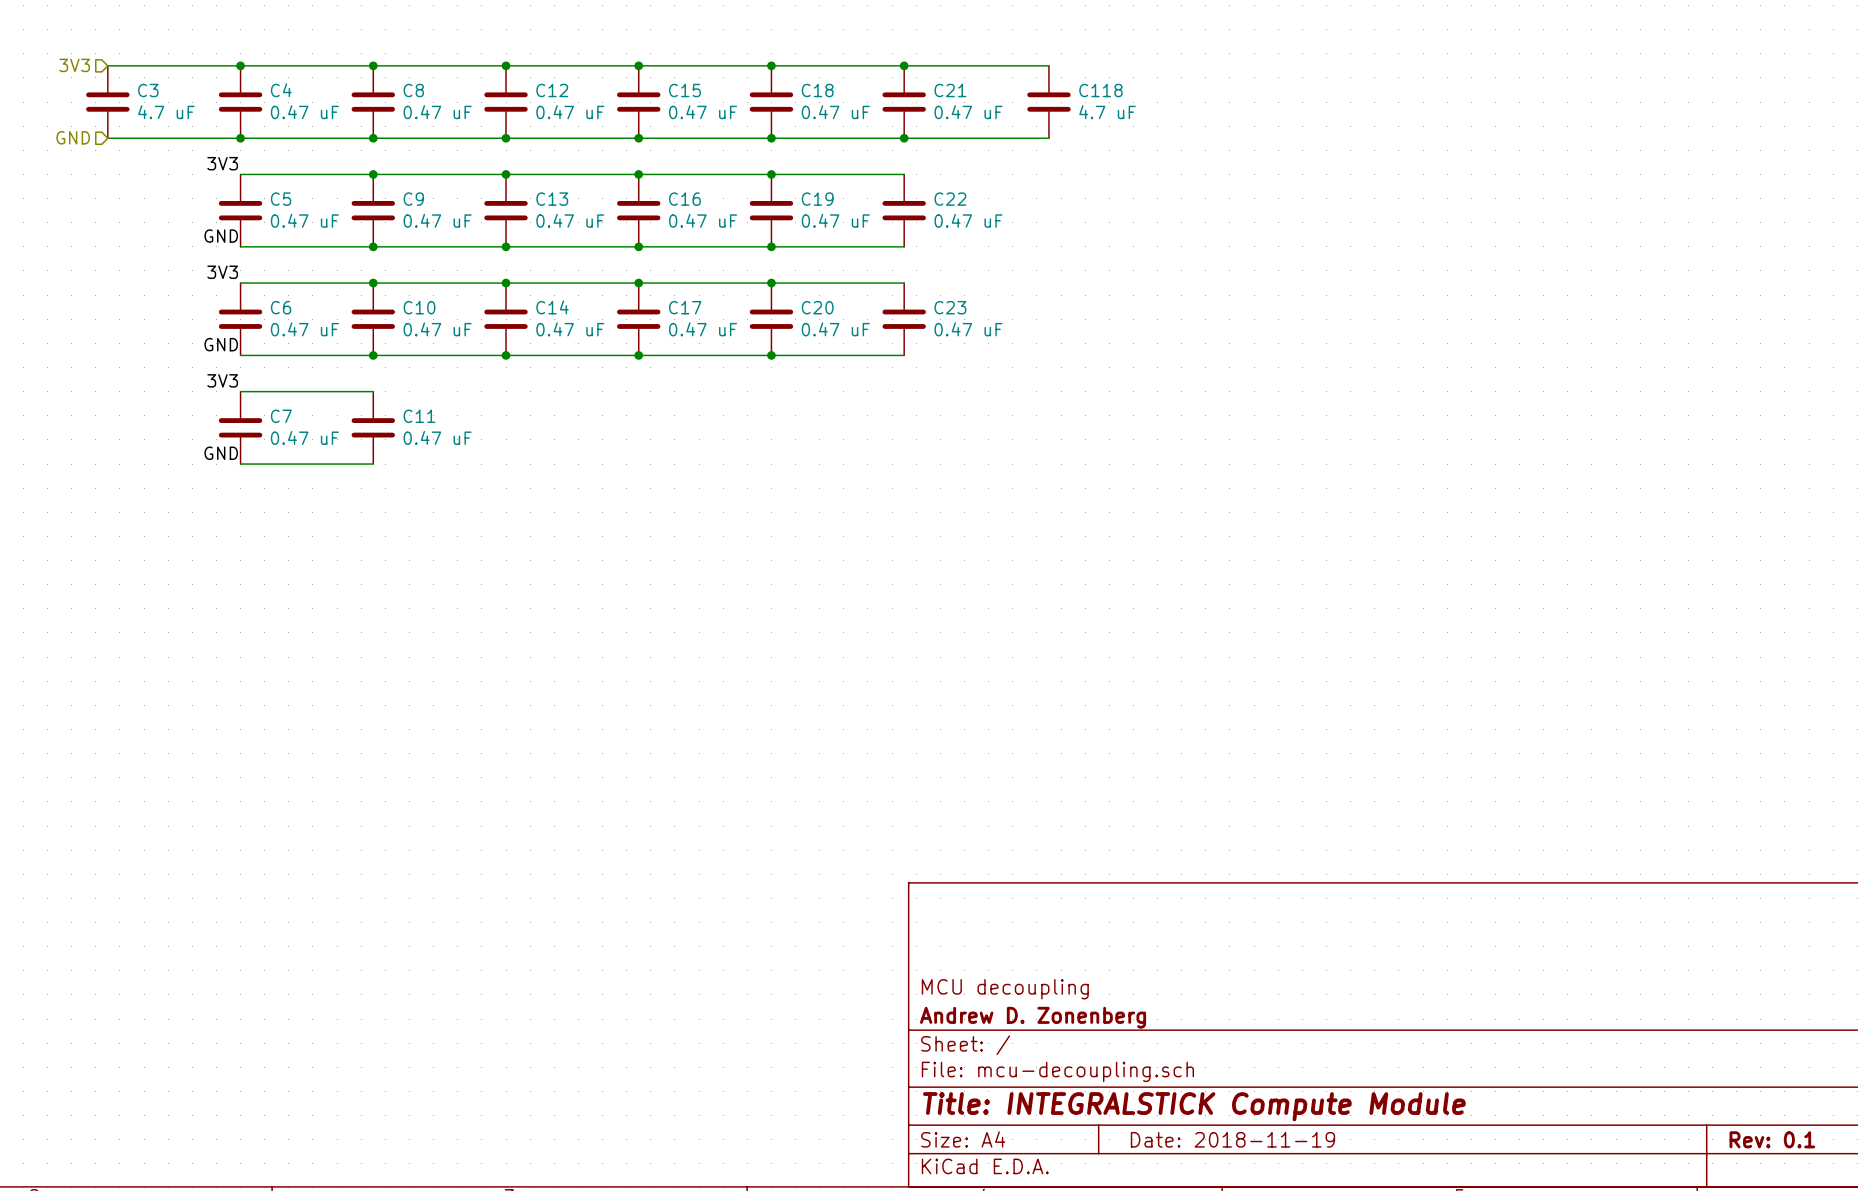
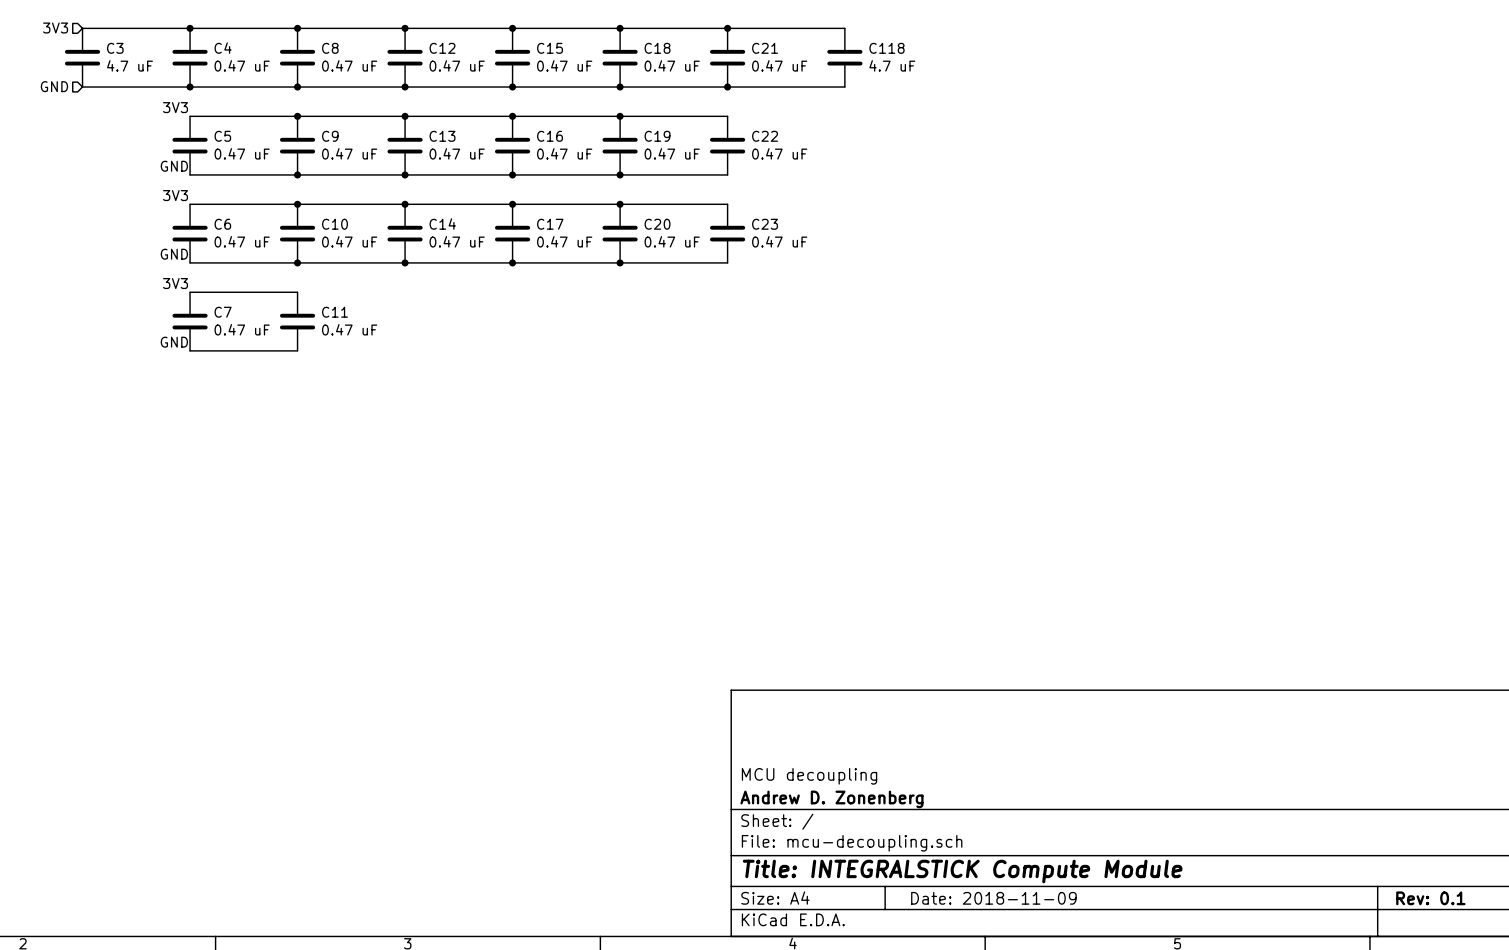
title block: Date: 2018-11-19 (1232, 1139) -> Date: 2018-11-09 (993, 898)

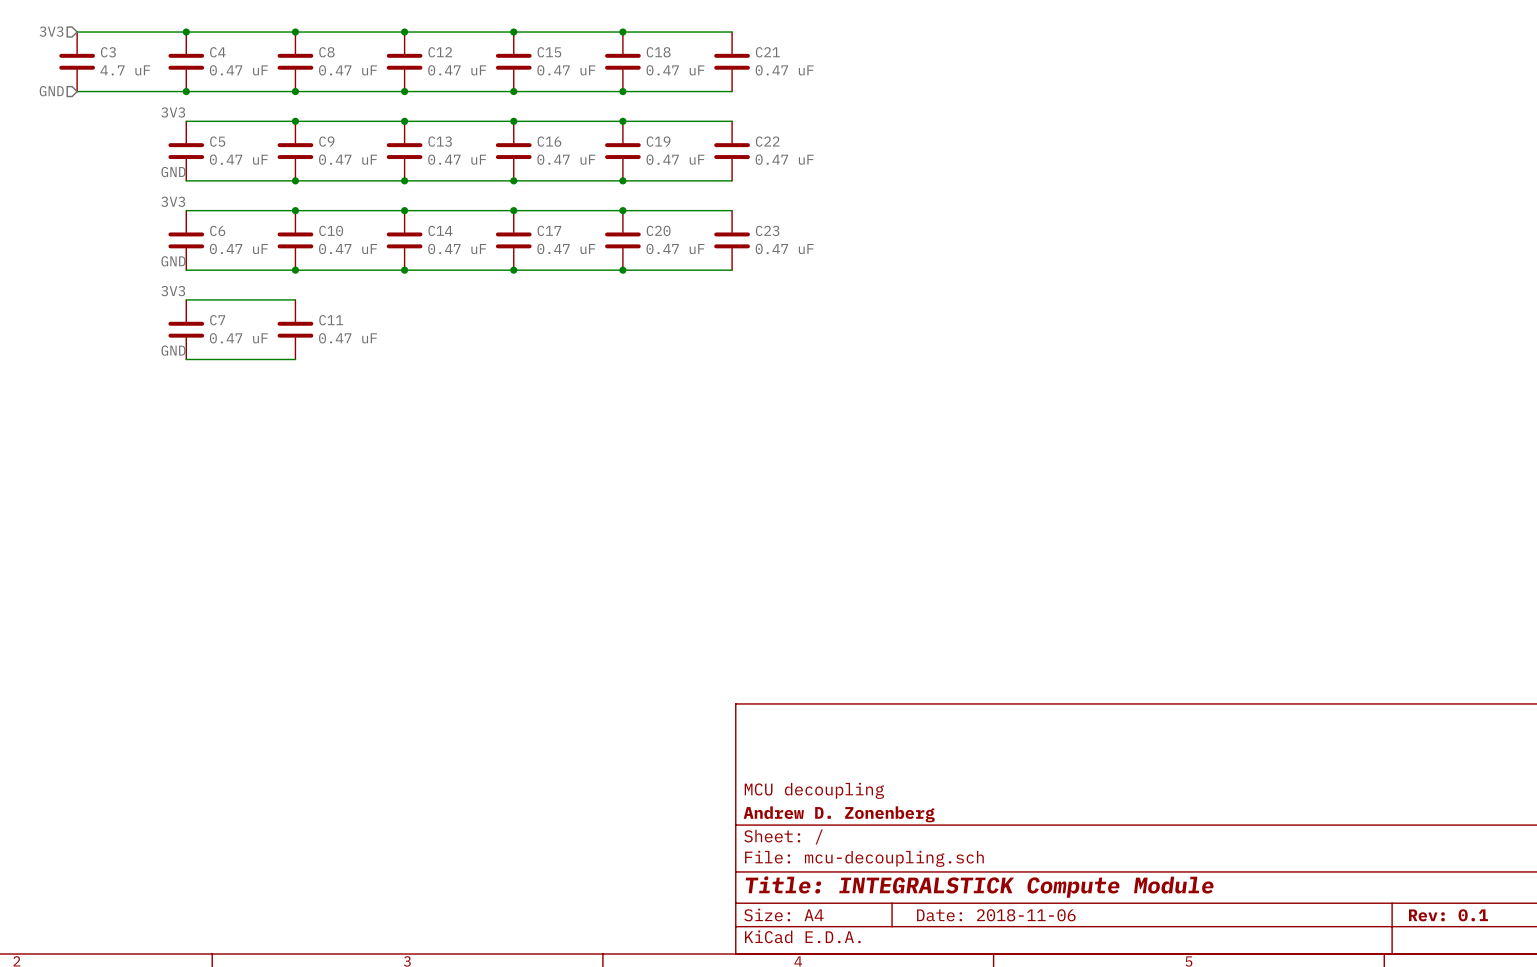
wire: (727, 28) (844, 28) -> none
junction: (727, 28) -> none
C118: 4.7 uF (844, 57) -> none
wire: (727, 87) (844, 87) -> none
junction: (727, 87) -> none
title block: Date: 2018-11-09 (993, 898) -> Date: 2018-11-06 (996, 915)

